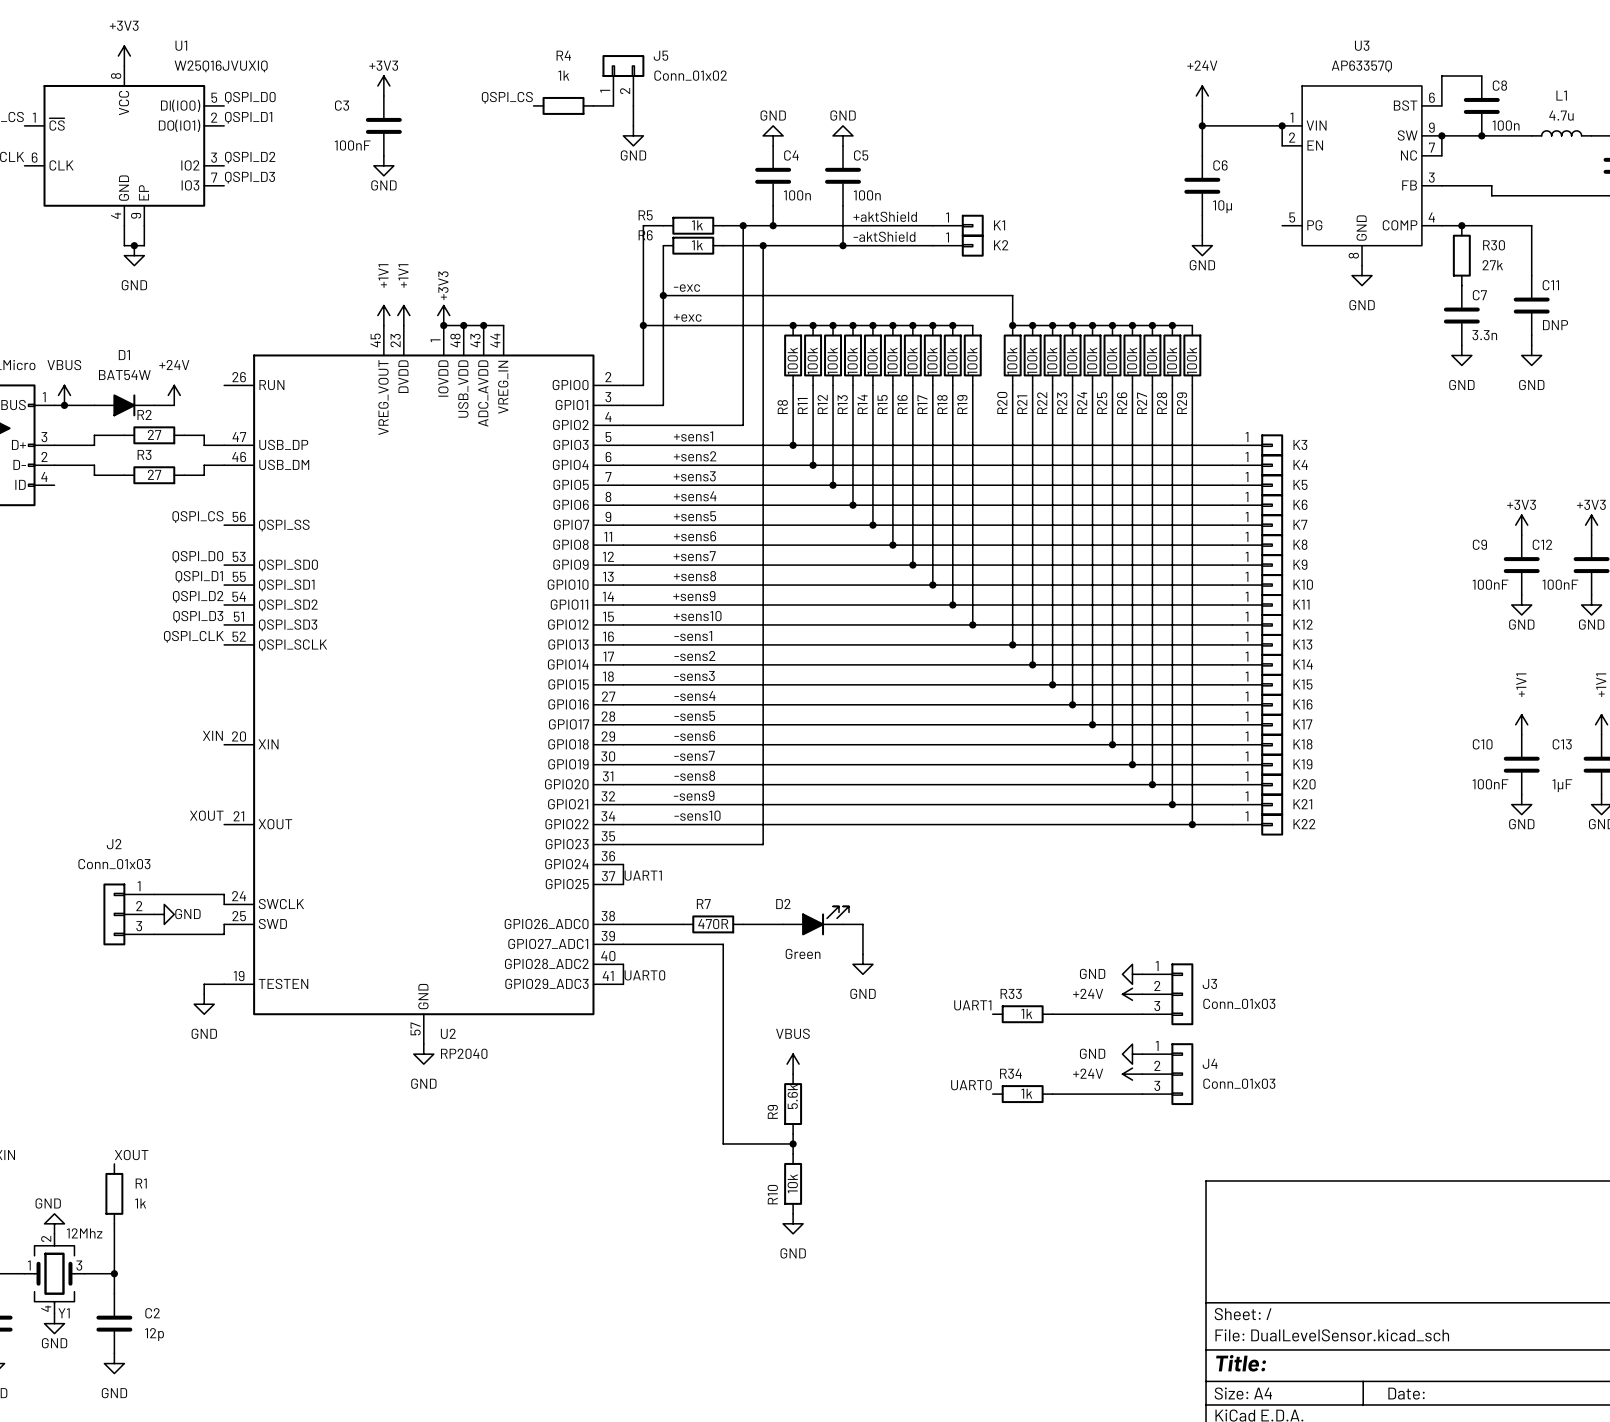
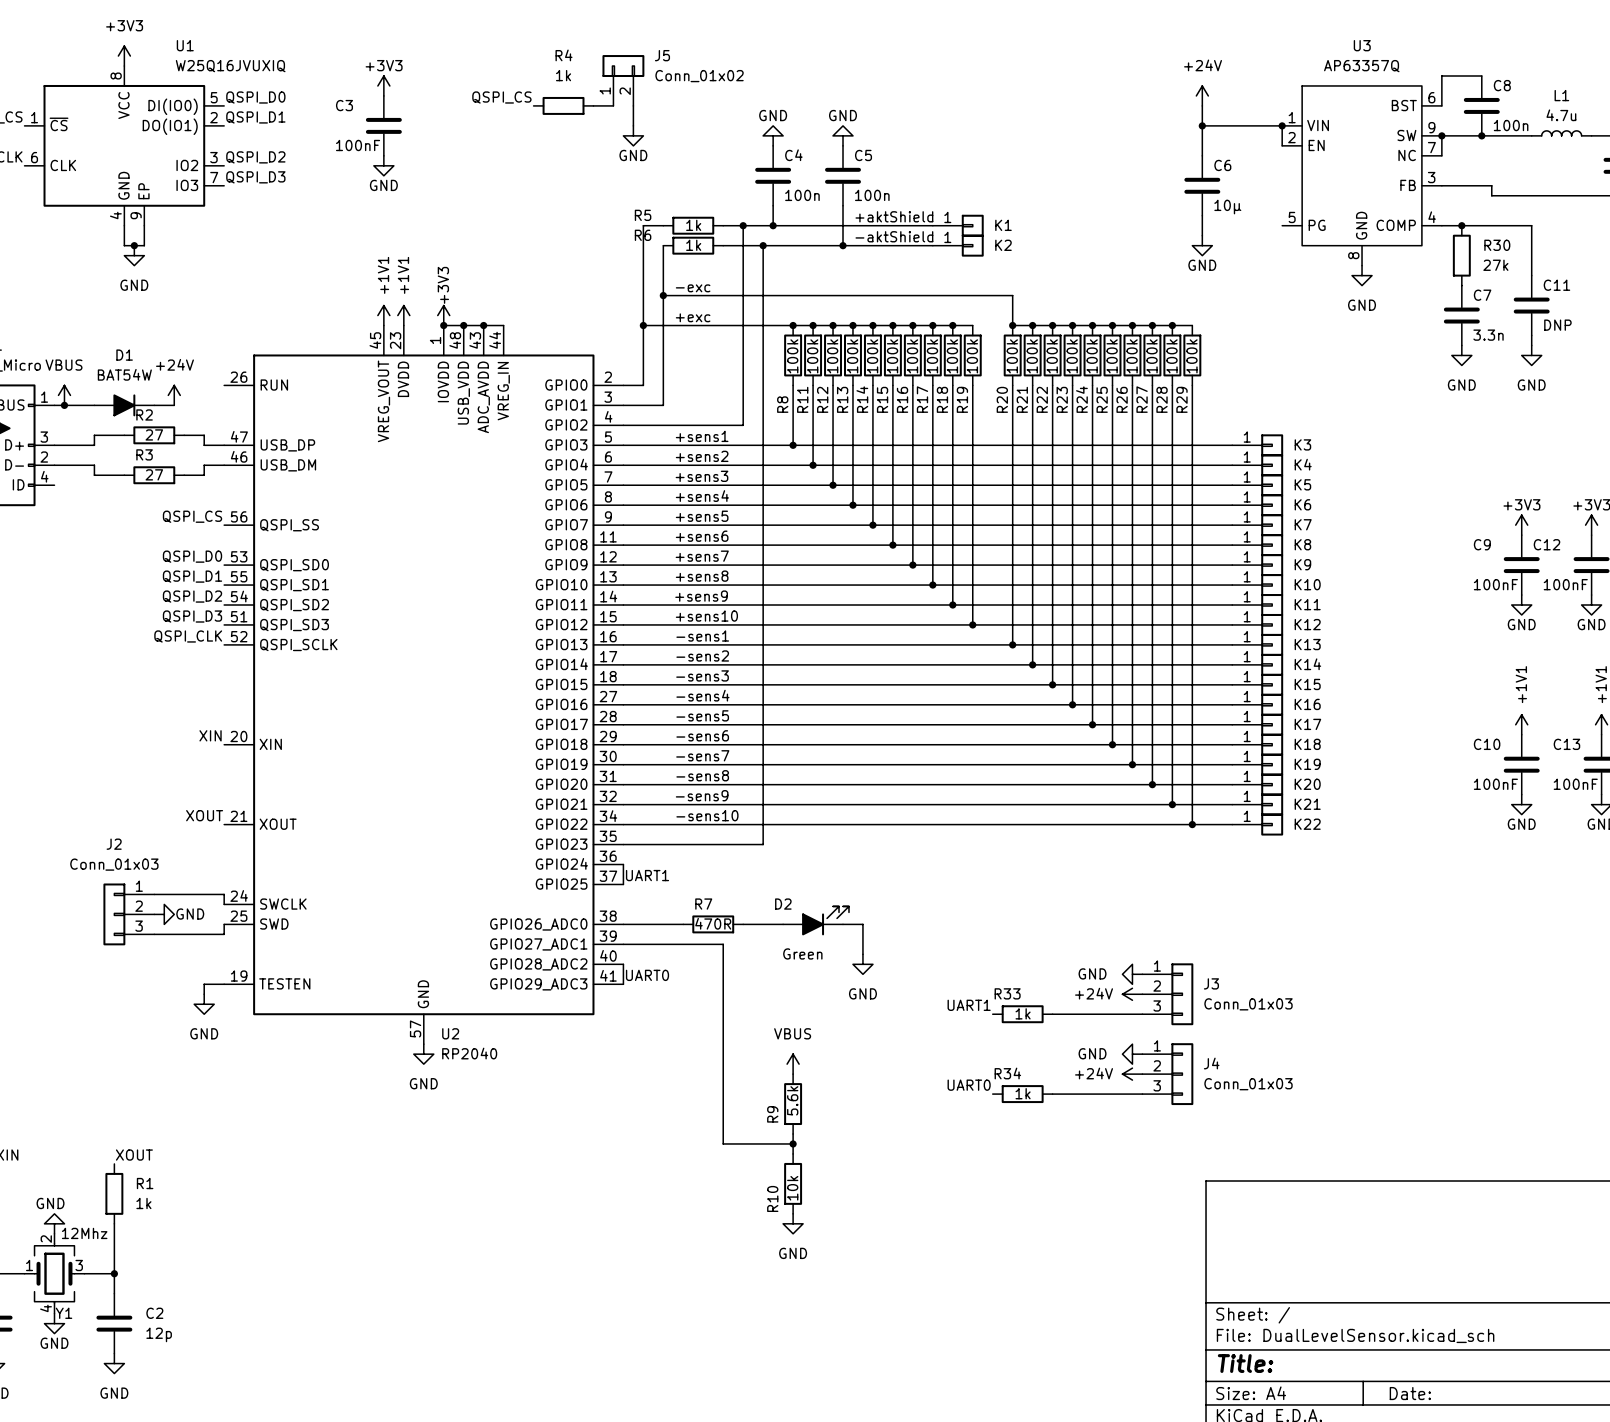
C13 value: 1µF (1562, 785) -> 100nF (1575, 784)

